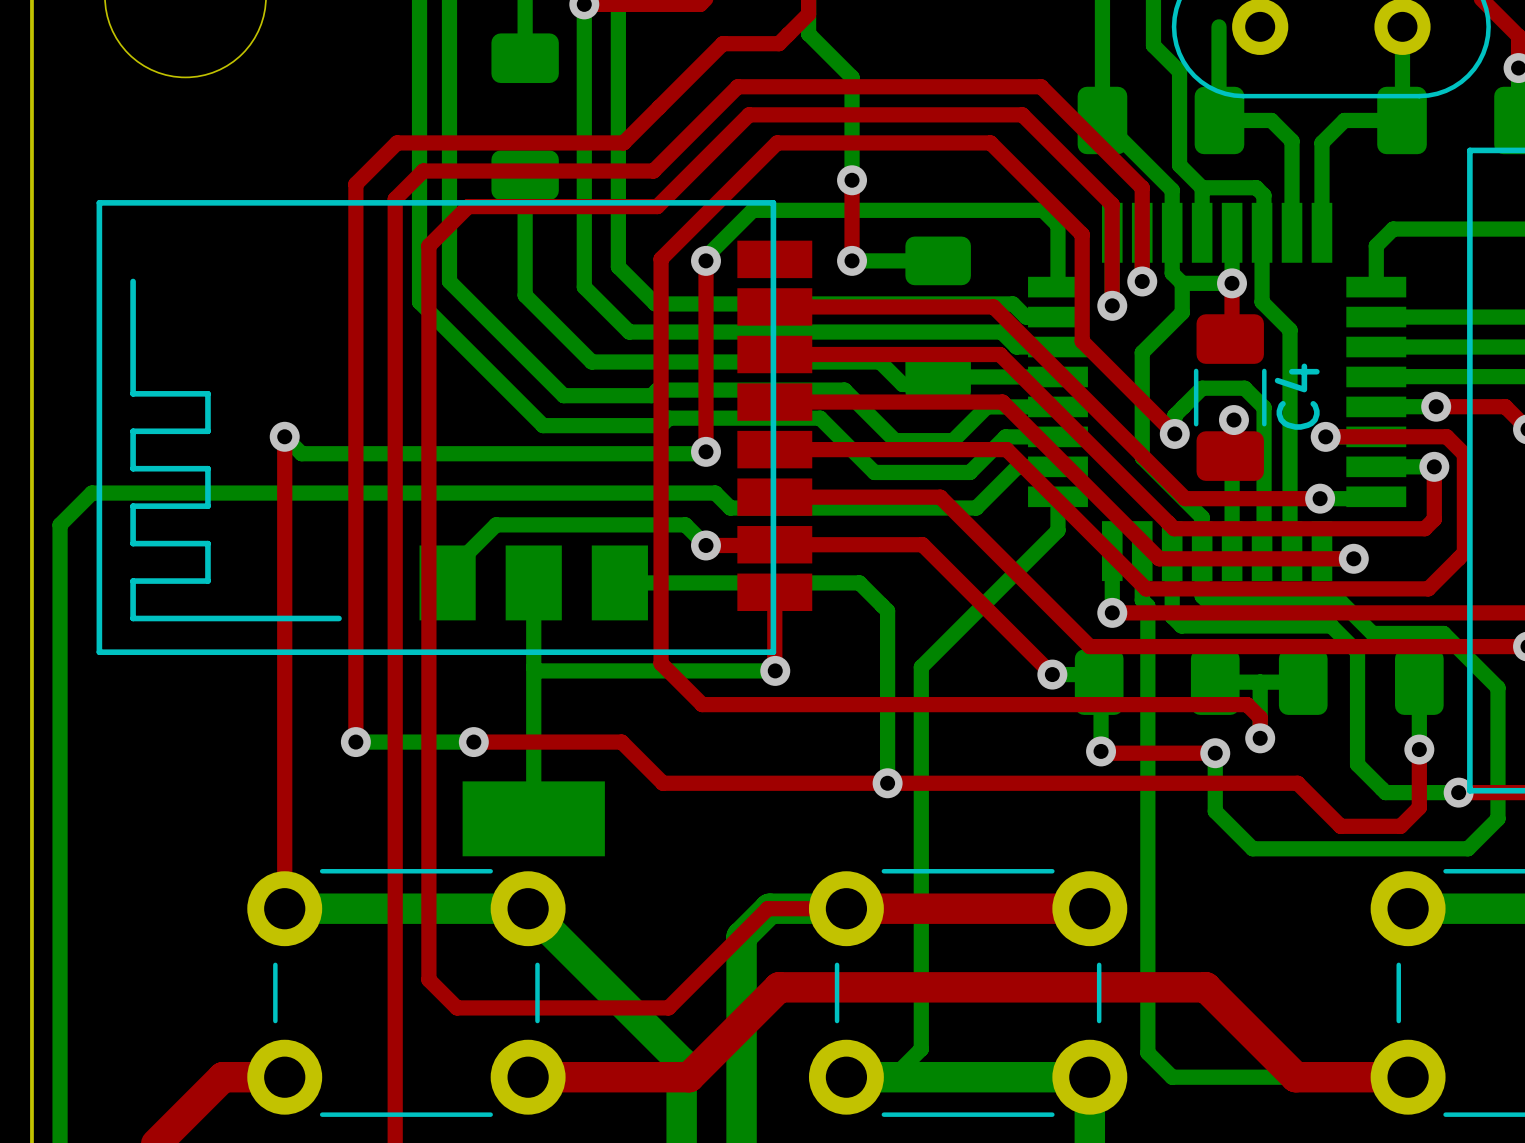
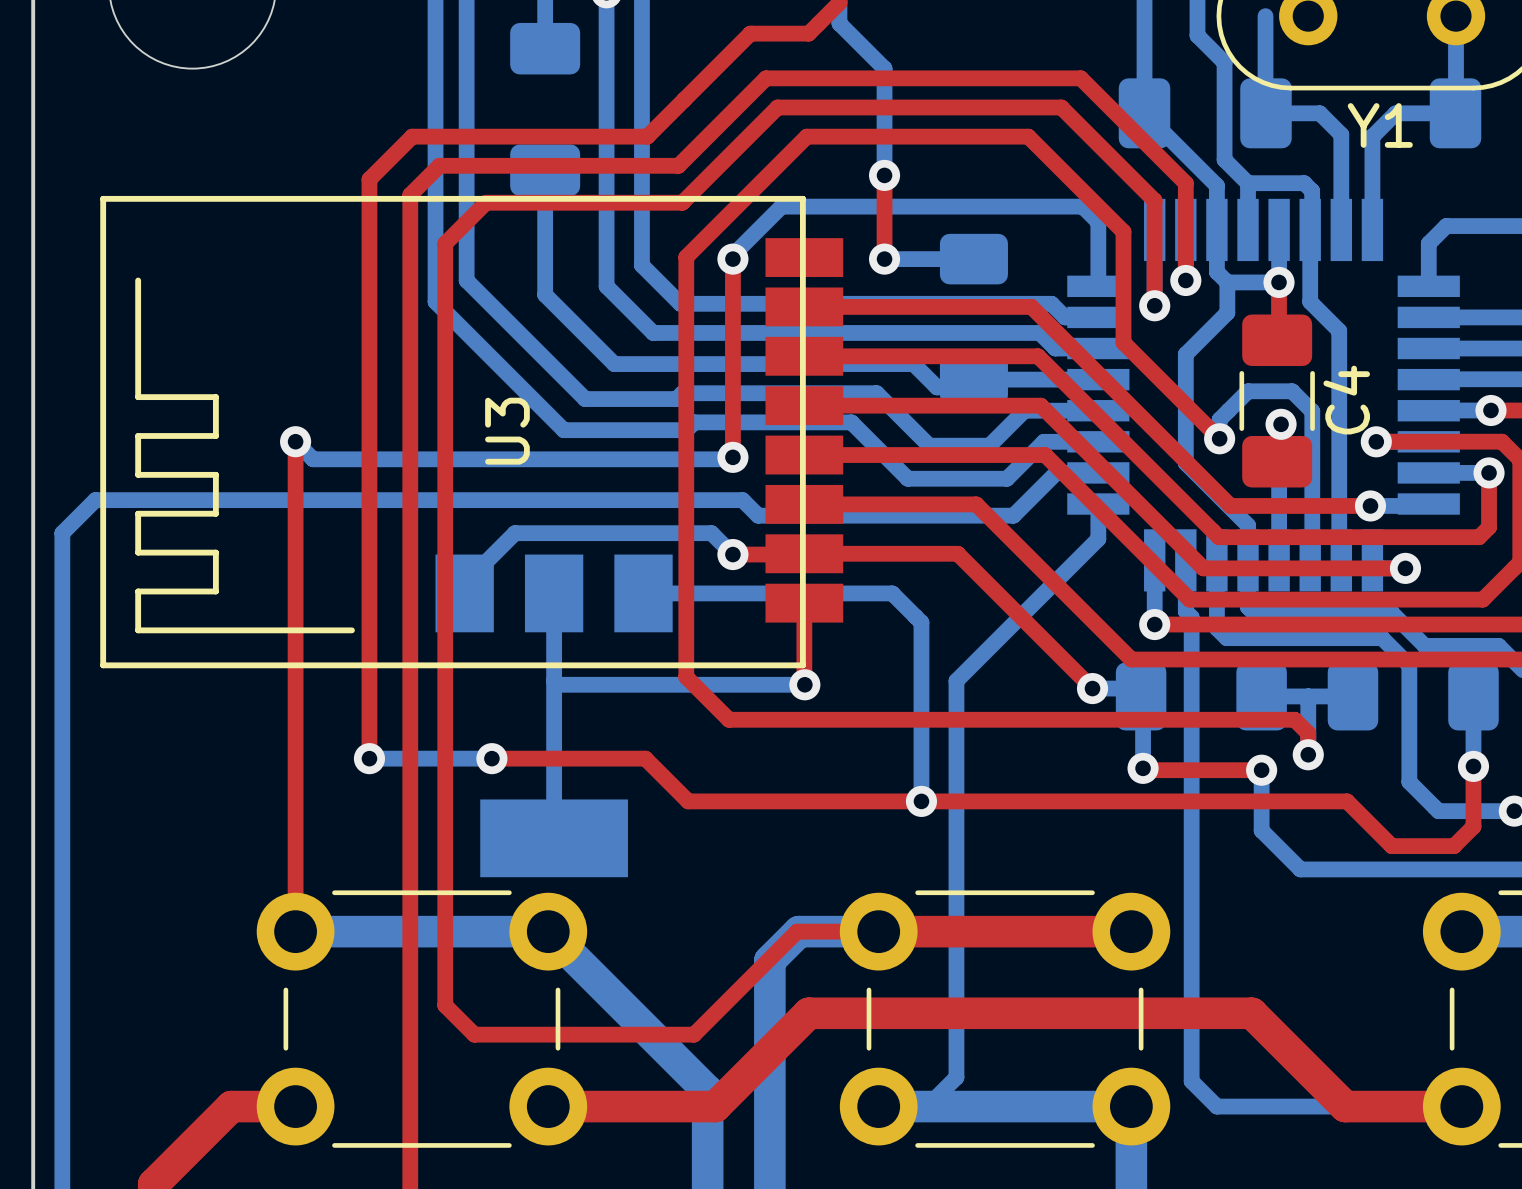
Y1 name: none -> Y1 (1380, 125)
U3 name: none -> U3 (507, 431)

